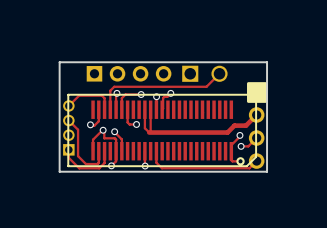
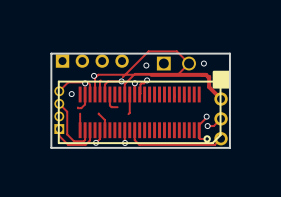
track: none -> (186, 61) (176, 51) (148, 51) (122, 77)
part position: (129, 73) -> (92, 61)
via: none -> (203, 63)
via: none -> (146, 65)
via: none -> (94, 75)
track: none -> (209, 76) (209, 87) (221, 99)
via: (116, 93) -> none
via: none -> (85, 83)
via: none -> (71, 94)
track: (144, 109) (144, 128) (149, 132) (227, 132) (234, 125) (246, 125) (256, 114) -> (124, 94) (124, 84) (135, 73) (206, 73) (209, 77) (206, 74) (151, 74)
via: (90, 124) -> none
via: (136, 124) -> none
via: (103, 130) -> none
via: (114, 131) -> none
track: (93, 139) (103, 130) (104, 138) (116, 139) (116, 151) -> (80, 120) (80, 113)

